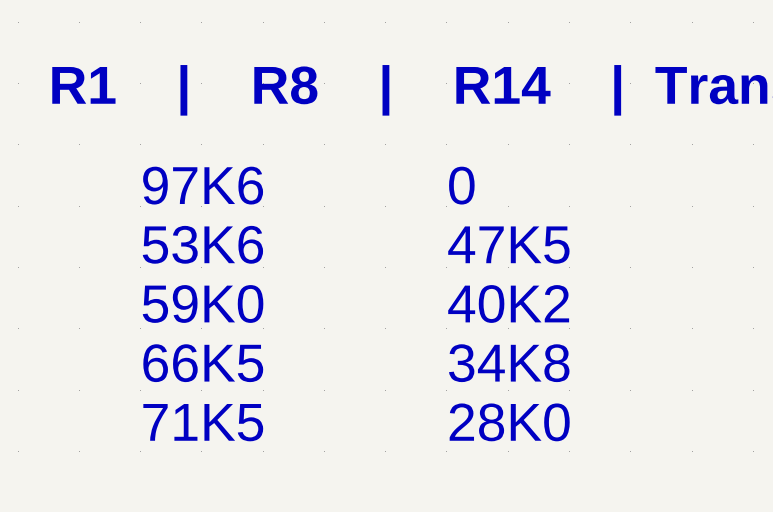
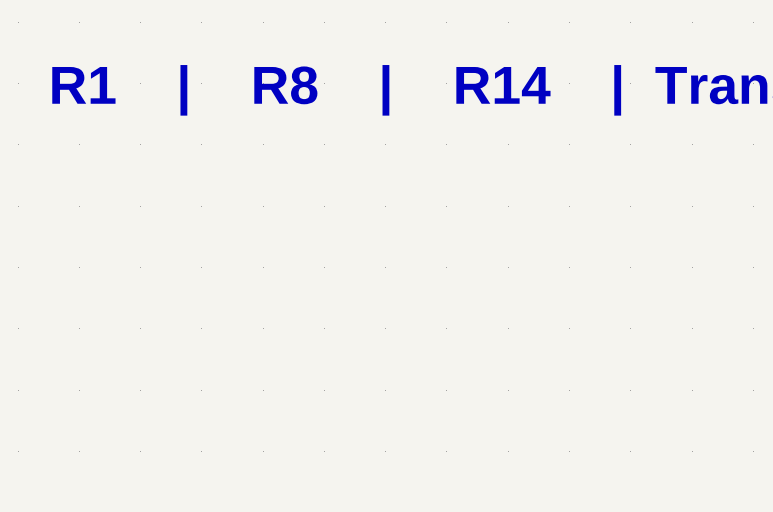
text: 97K6 (203, 185) -> none
text: 0 (461, 185) -> none
text: 53K6 (202, 244) -> none
text: 47K5 (508, 245) -> none
text: 59K0 (203, 303) -> none
text: 40K2 (508, 303) -> none
text: 66K5 (203, 363) -> none
text: 34K8 (509, 363) -> none
text: 71K5 (203, 422) -> none
text: 28K0 (509, 422) -> none

